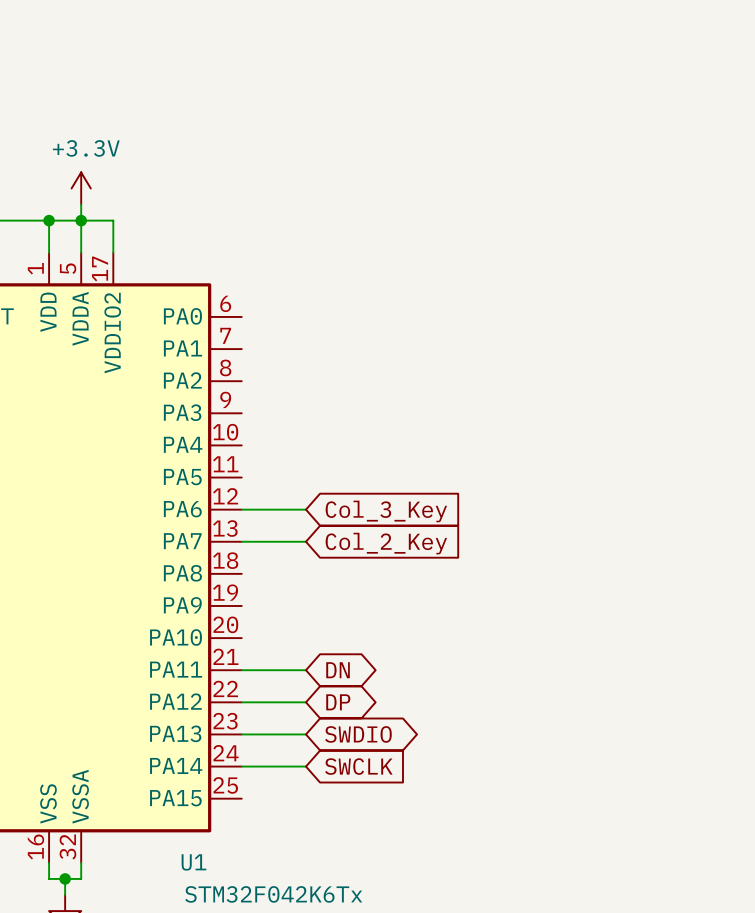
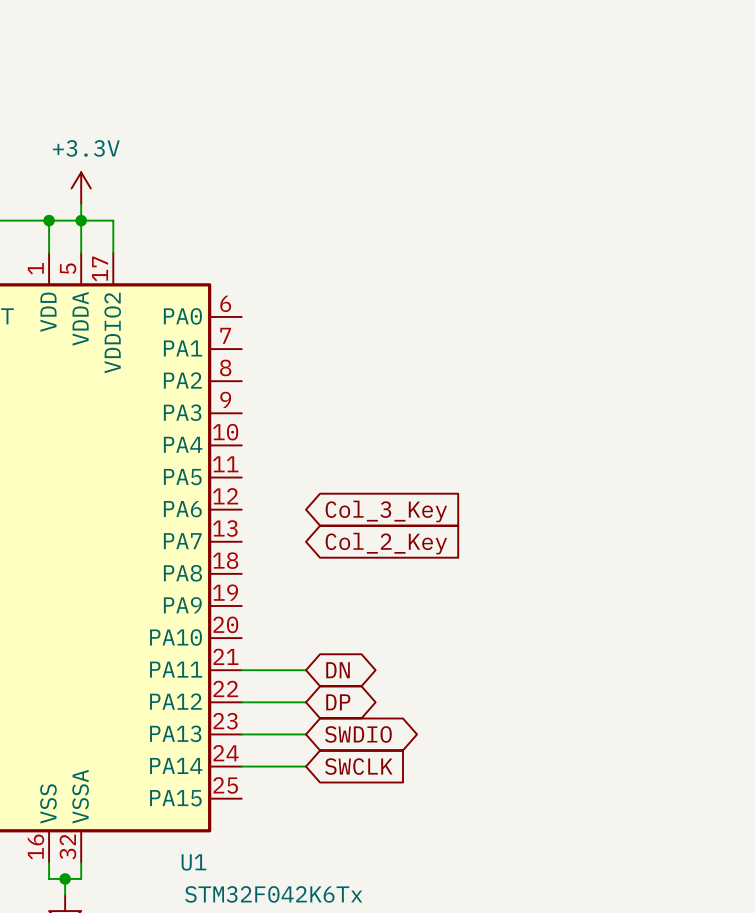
wire: (241, 509) (305, 509) -> none
wire: (241, 541) (305, 541) -> none

